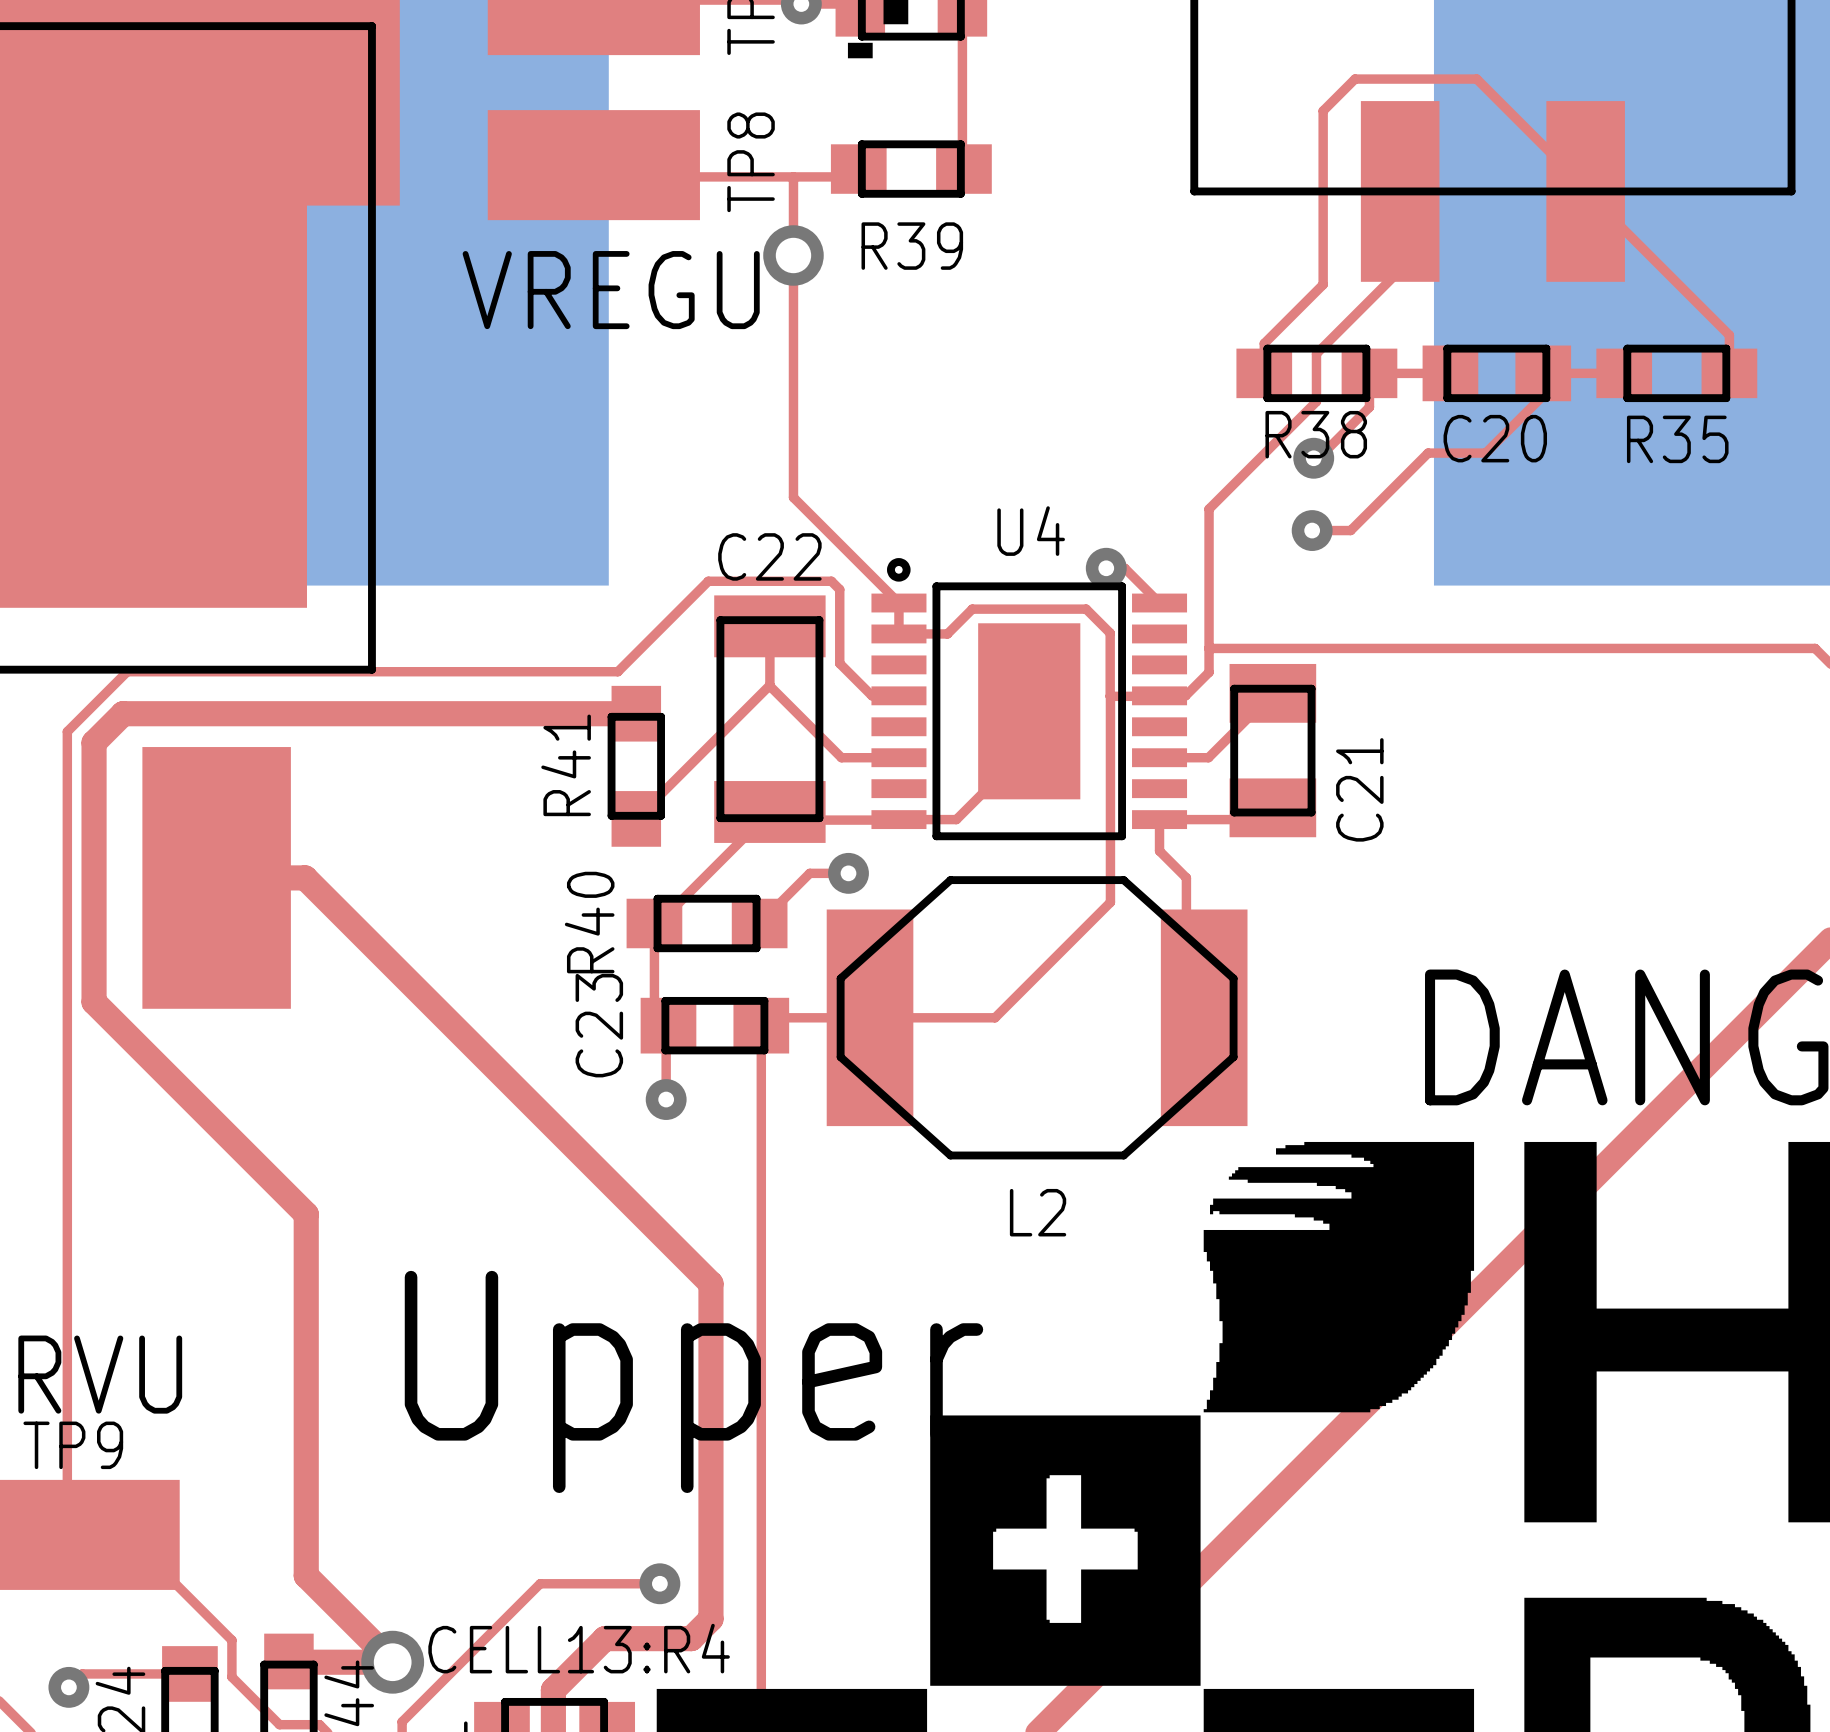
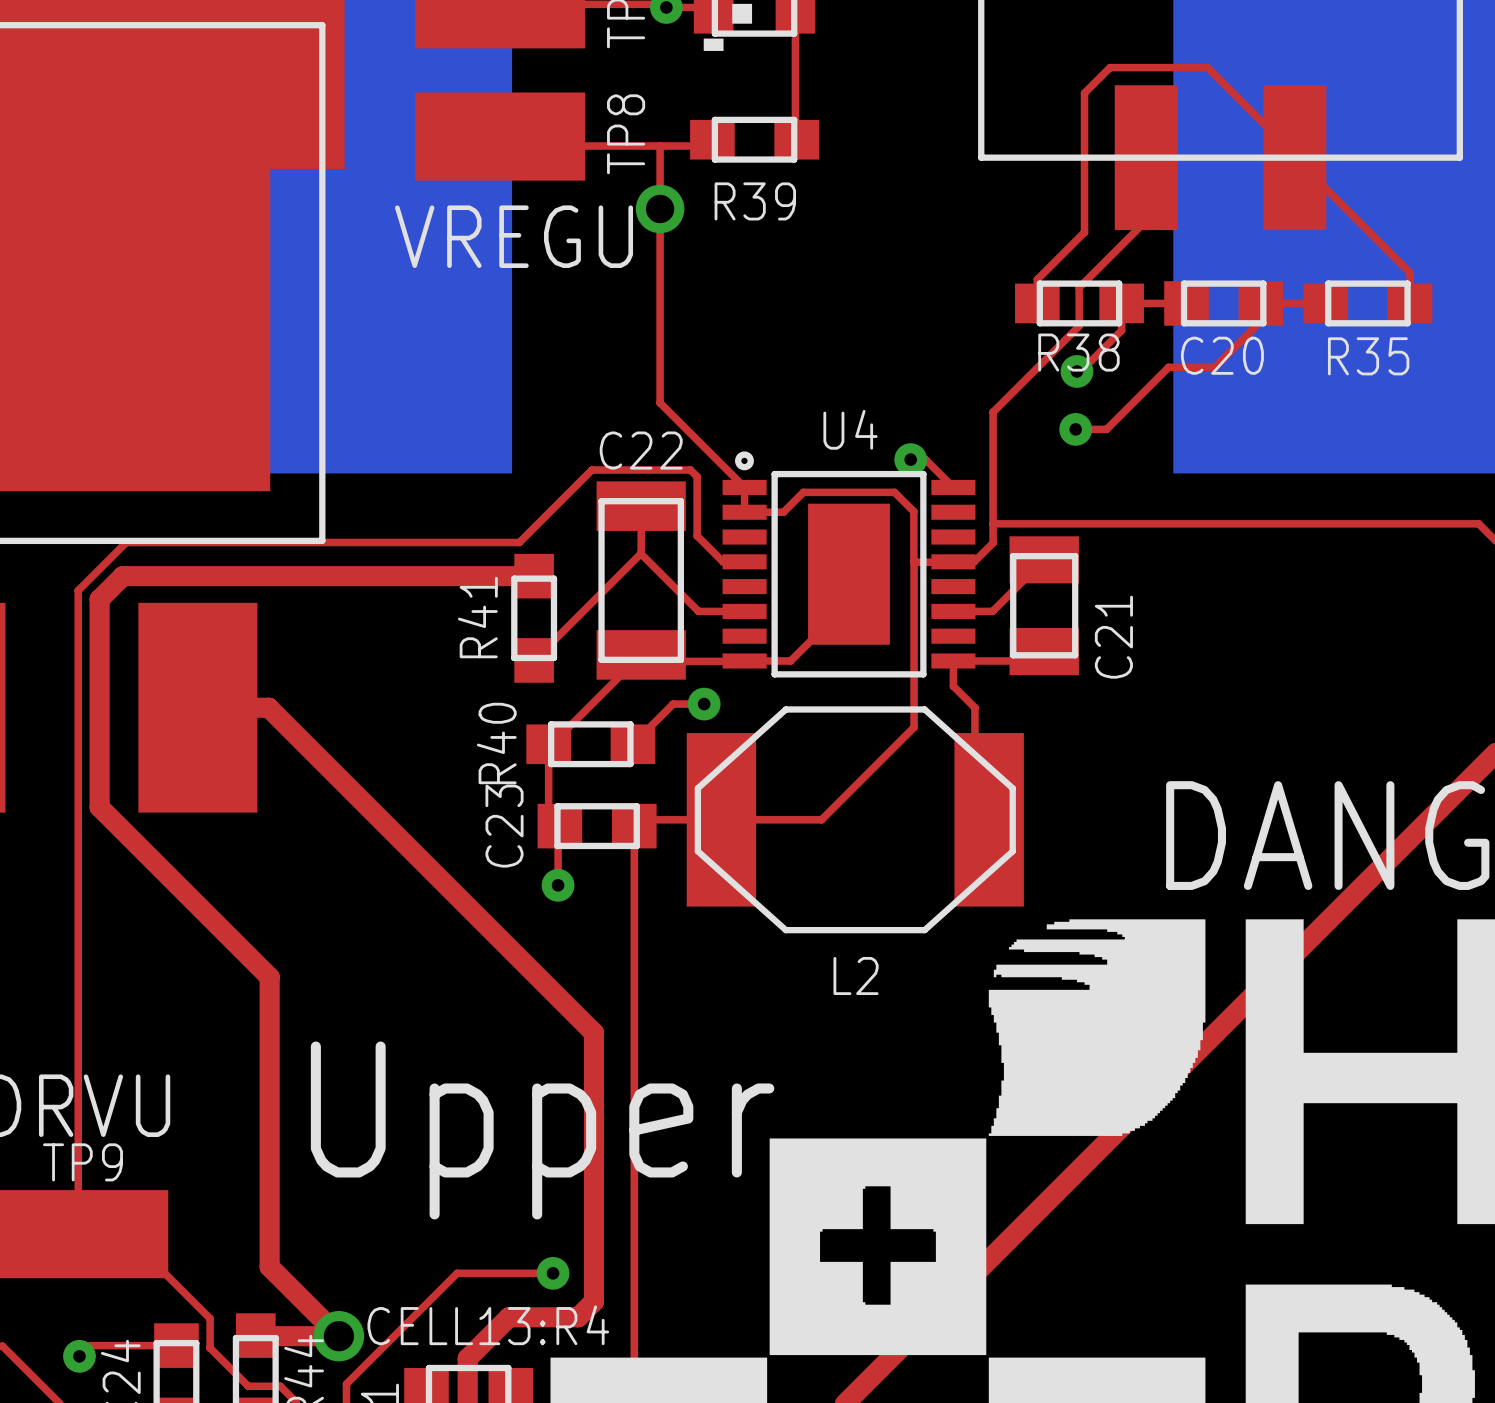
text position: Upper (693, 1381) -> Upper (542, 1130)

